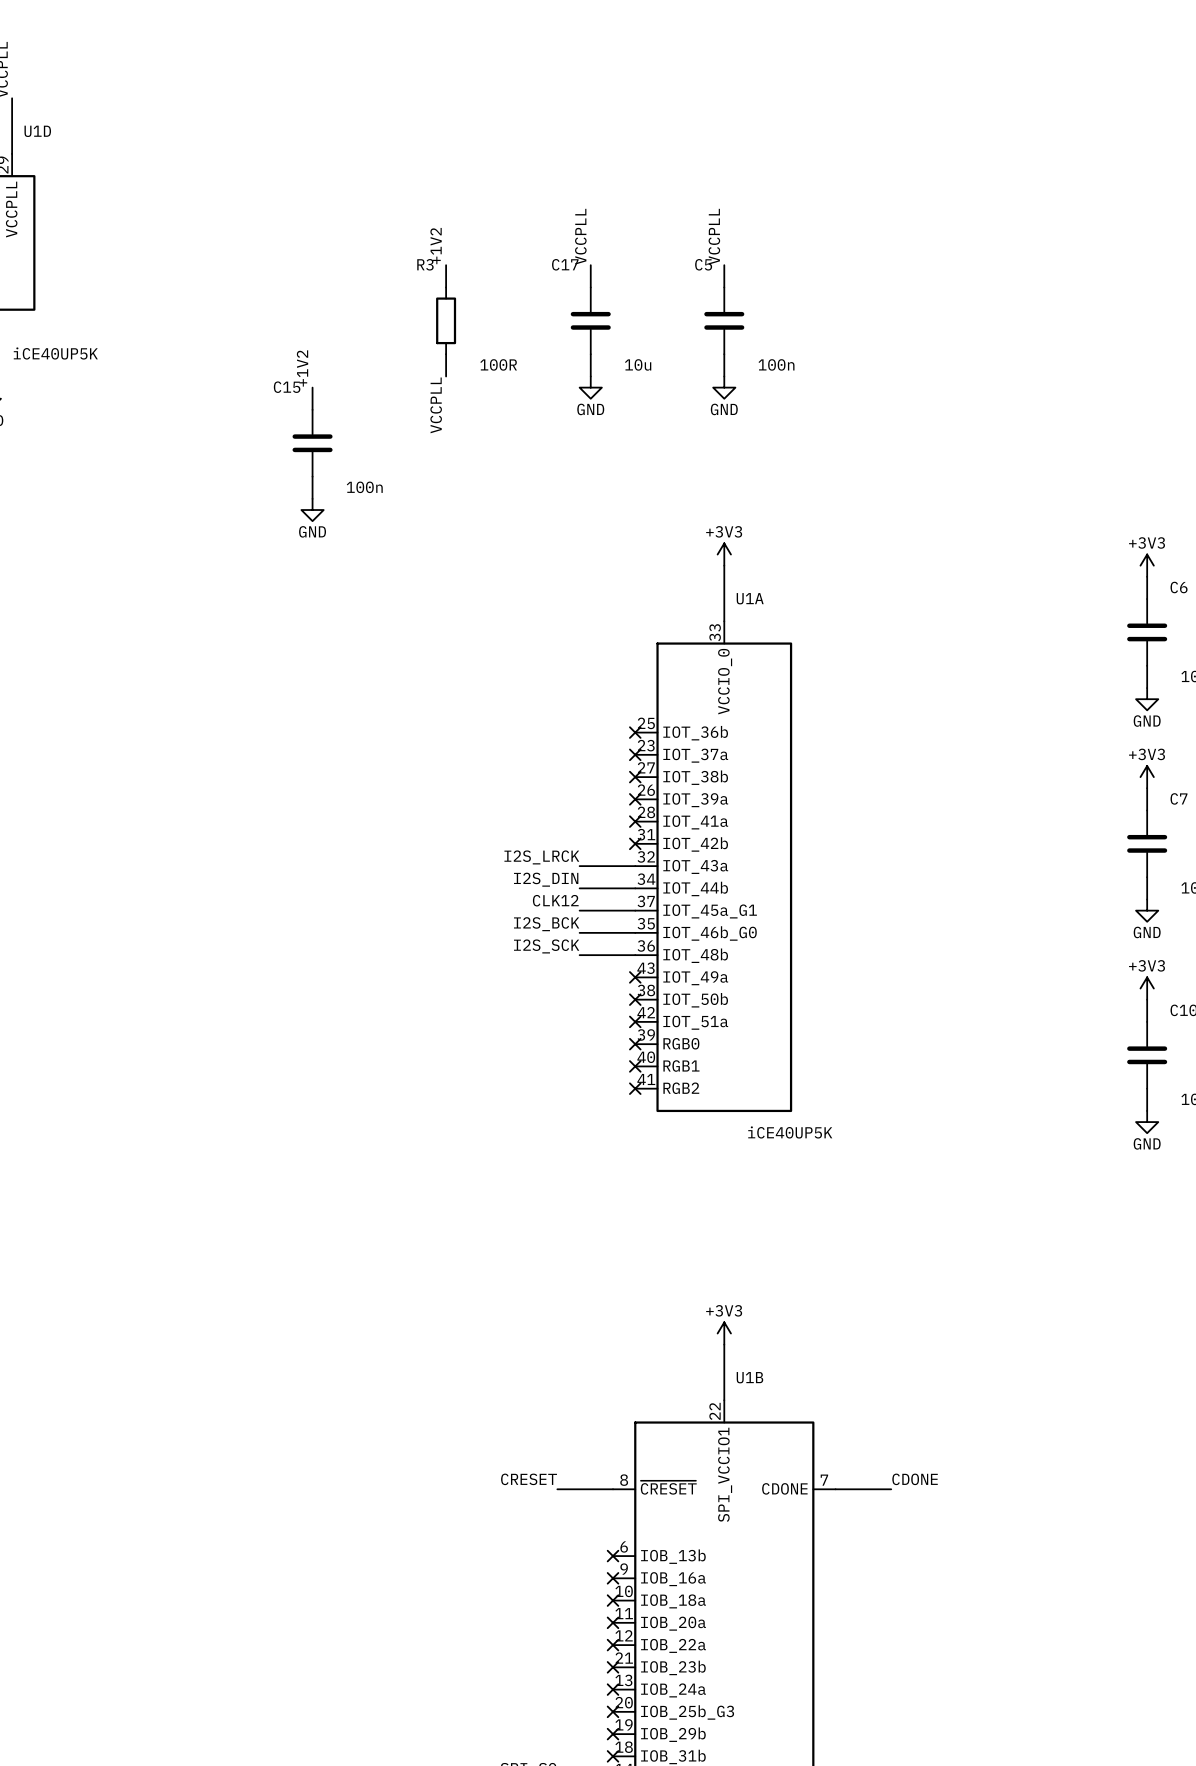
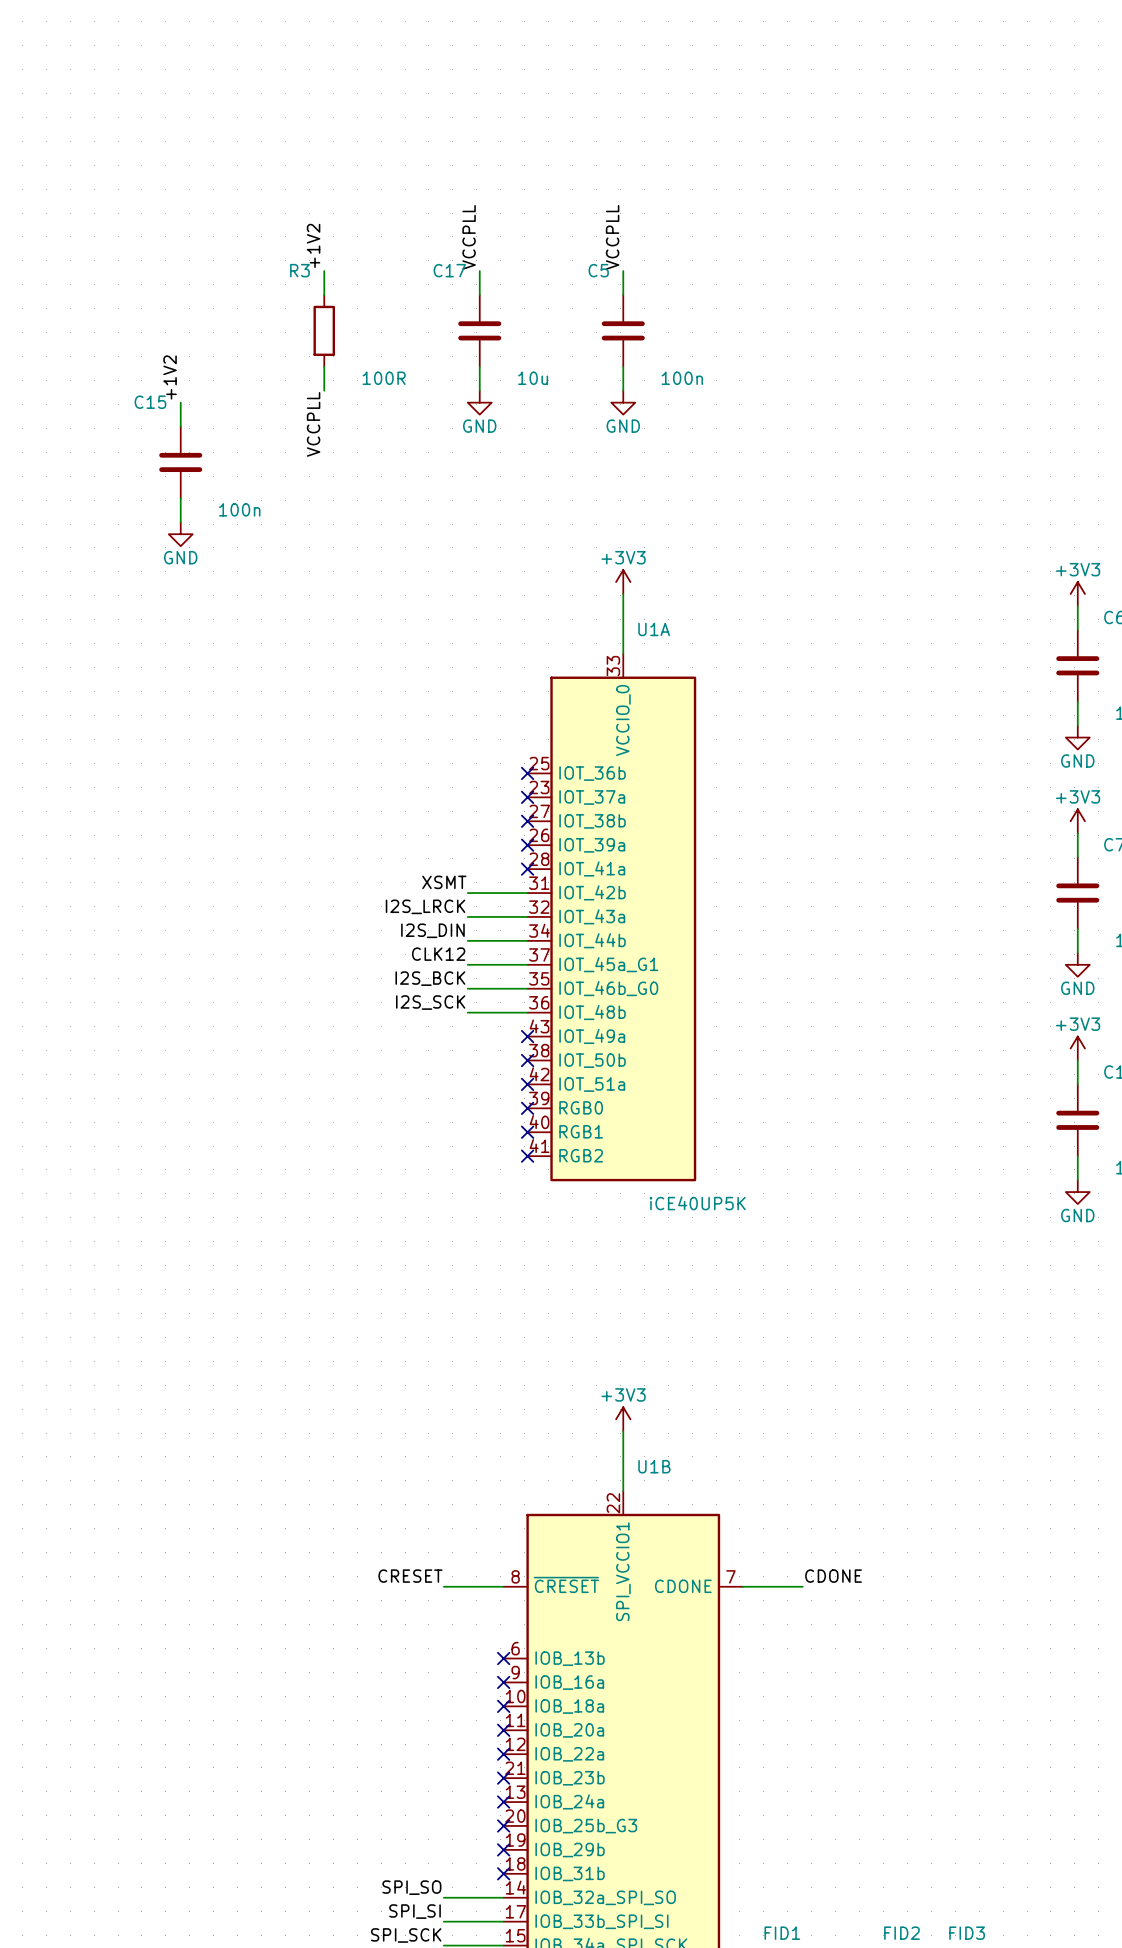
label: none -> XSMT (444, 882)
wire: none -> (467, 893) (527, 893)
no-connect mark: (635, 843) -> none

